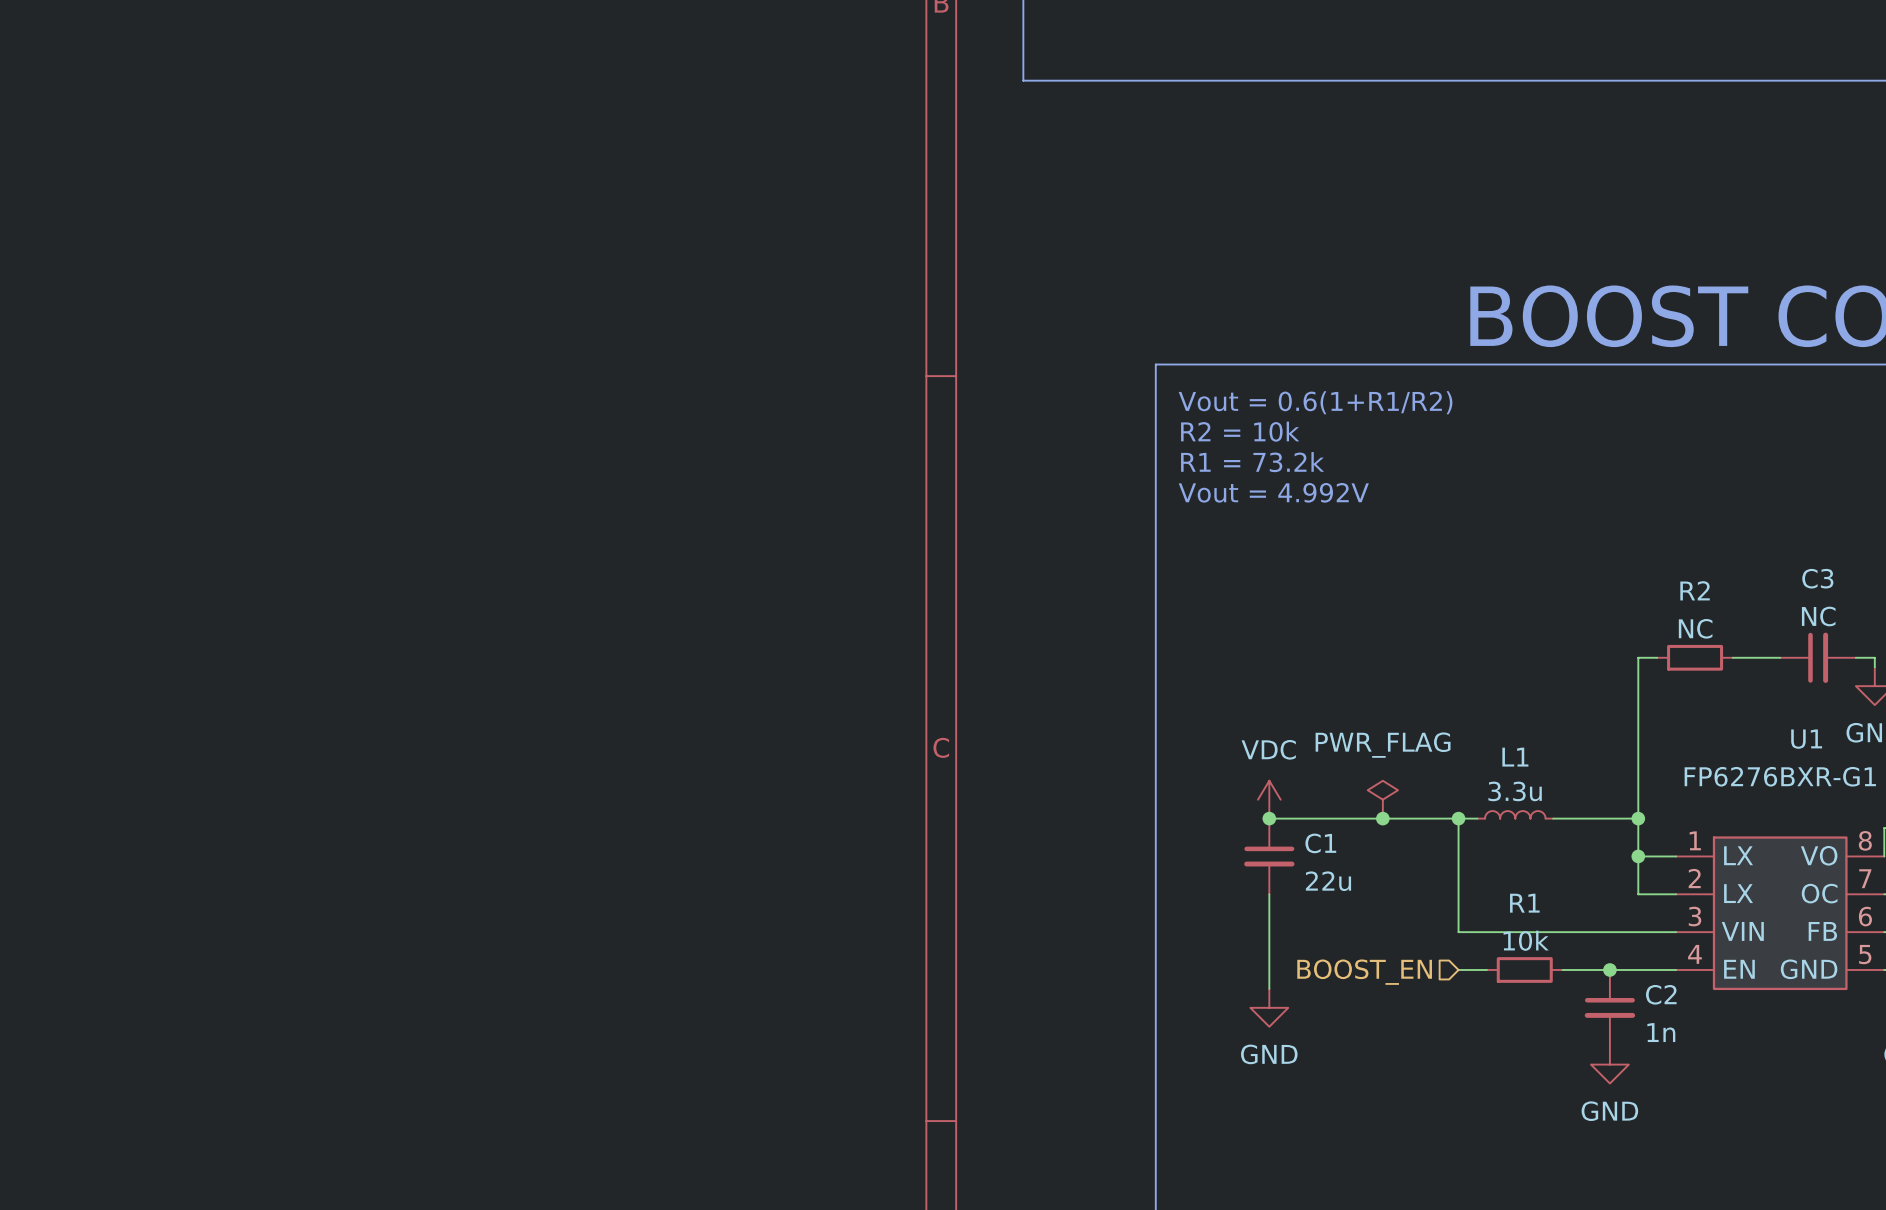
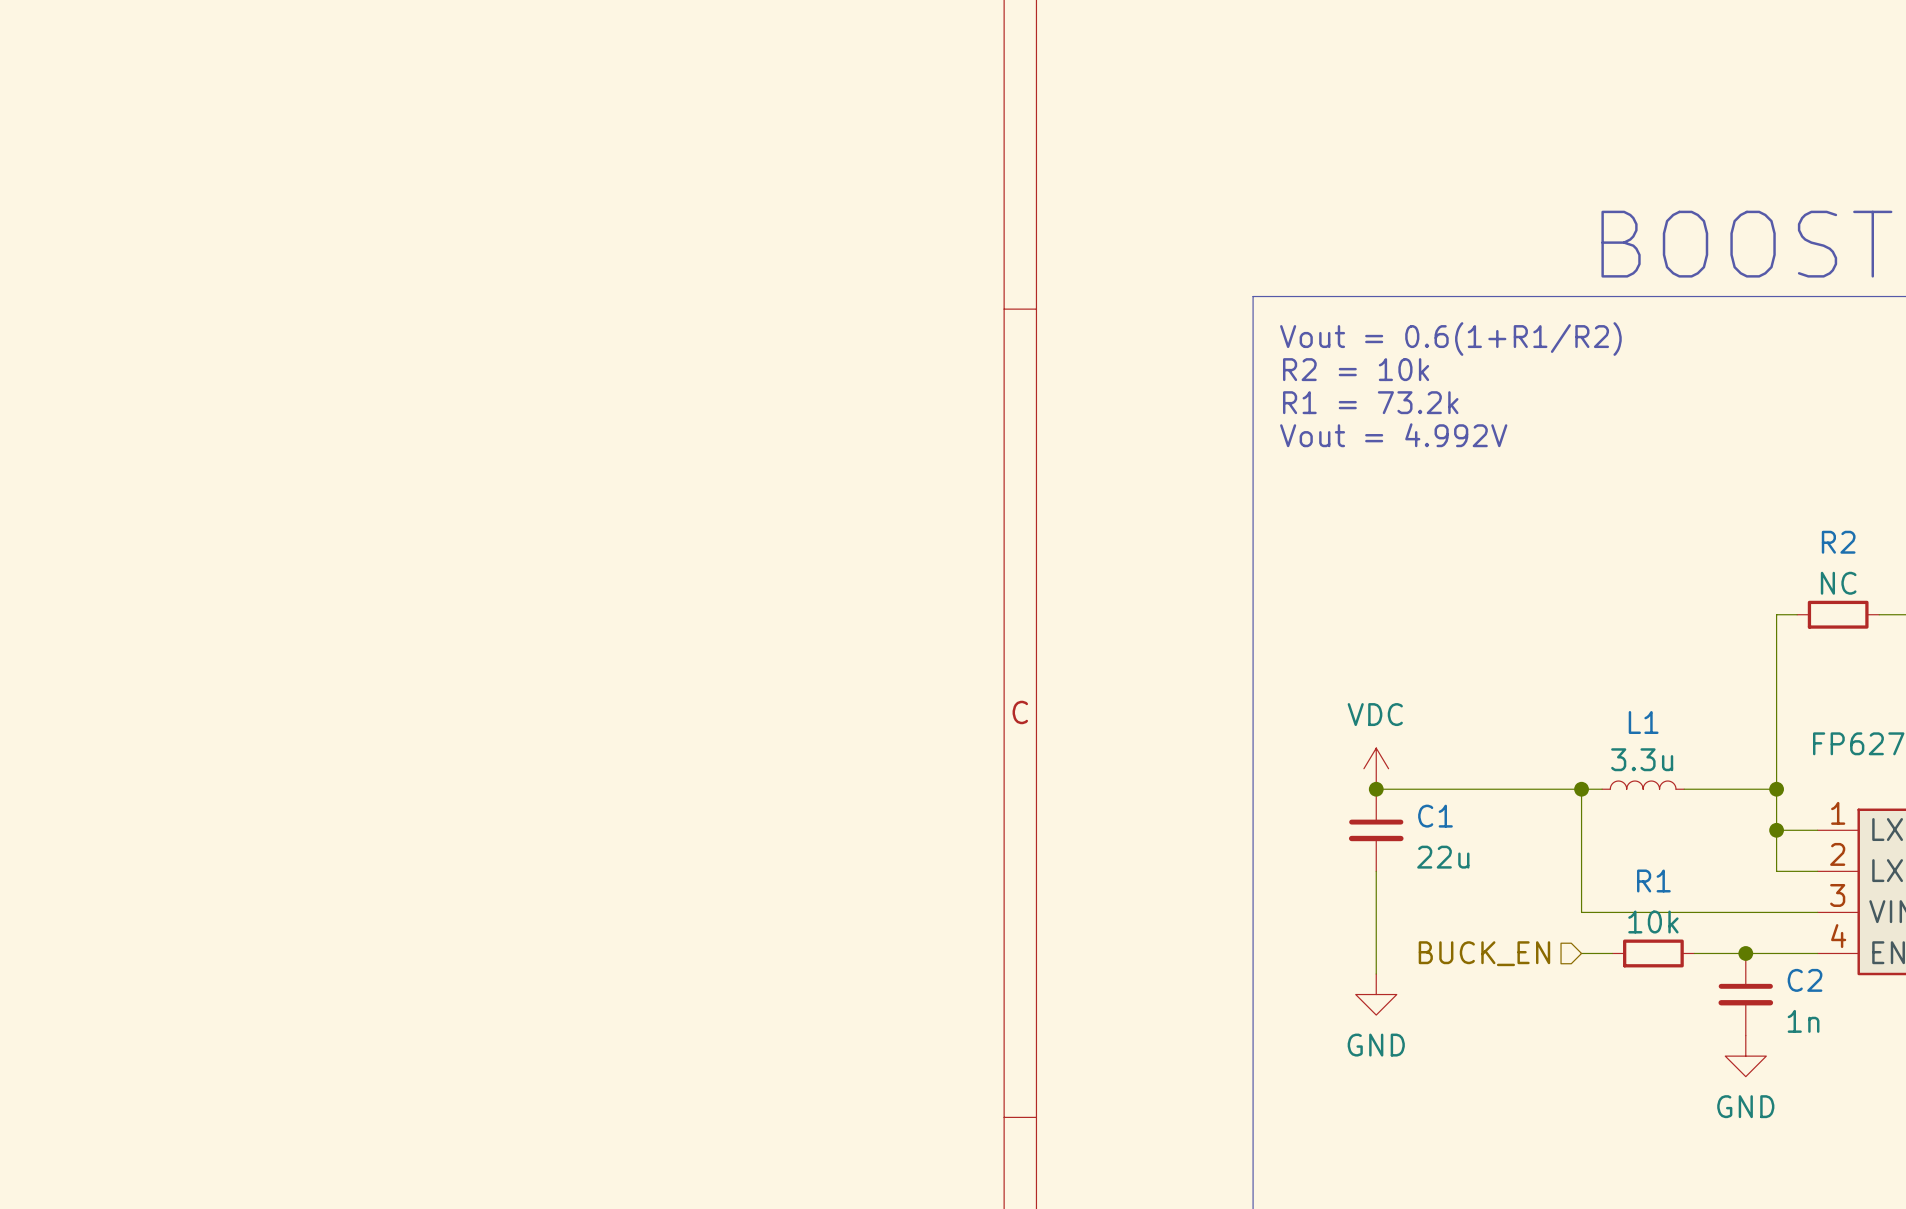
power symbol: PWR_FLAG (1382, 799) -> none
junction: (1382, 818) -> none
hierarchical label: BOOST_EN (1364, 972) -> BUCK_EN (1484, 953)

